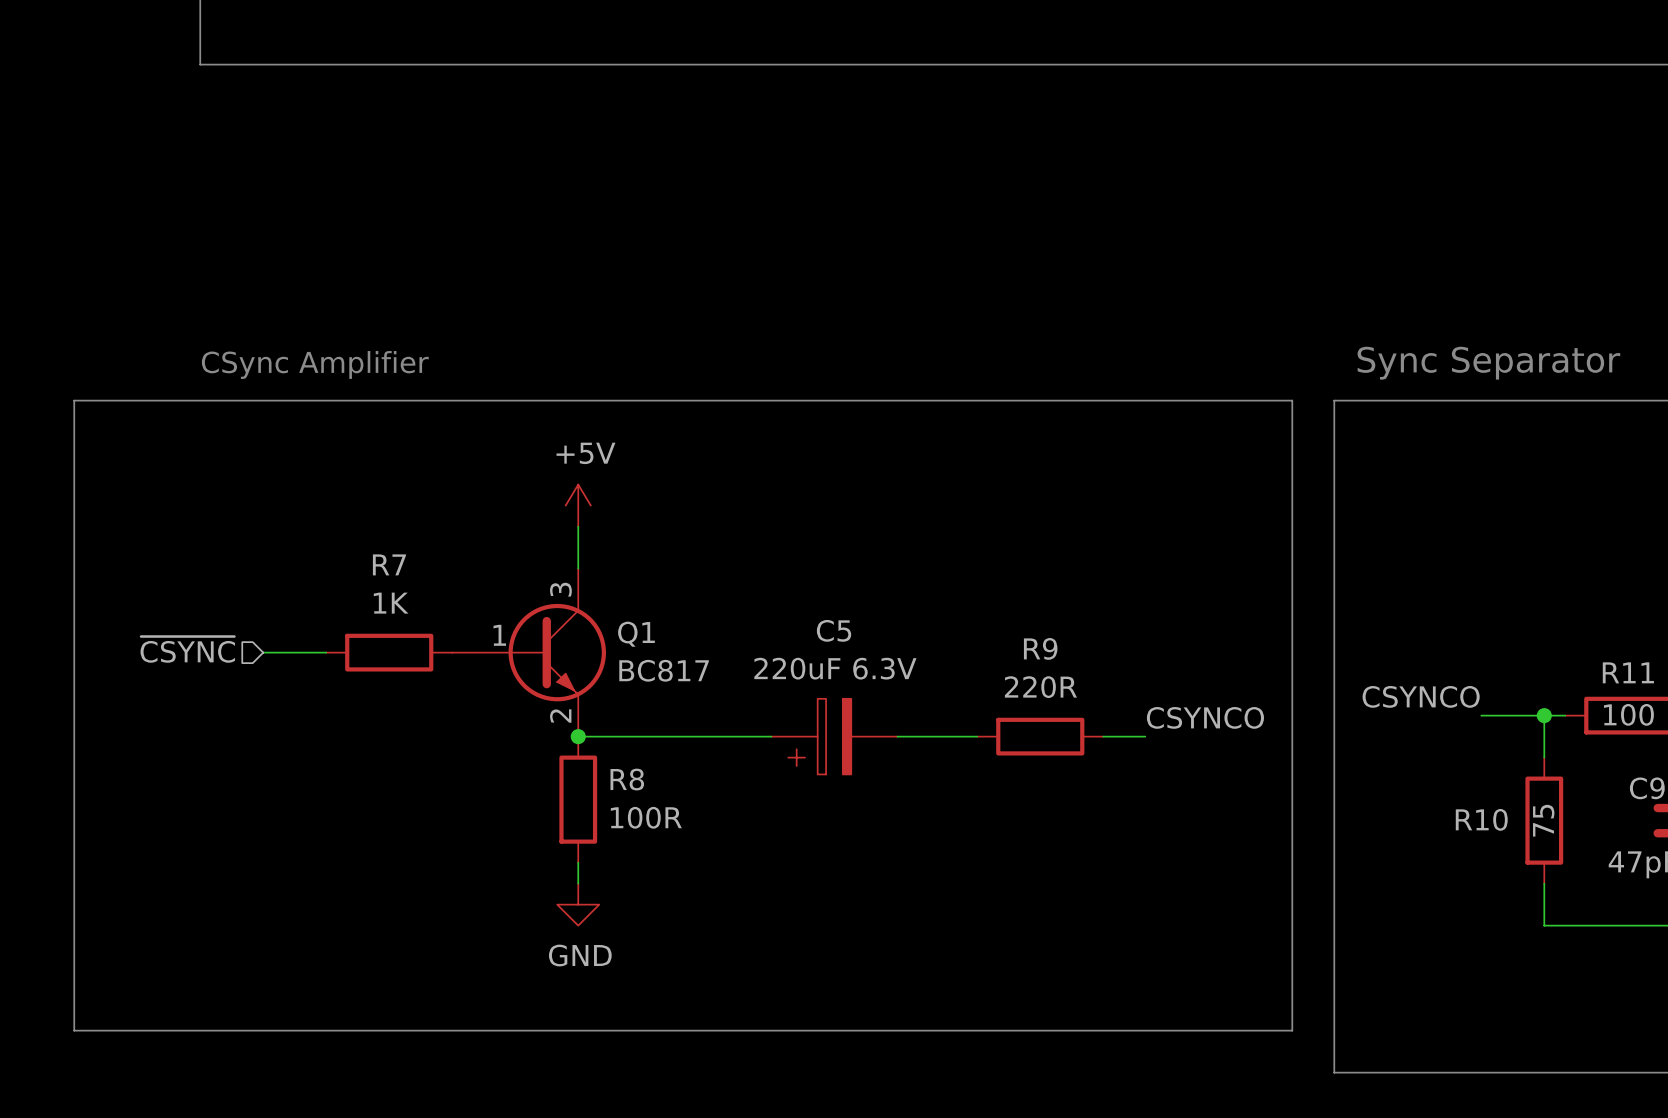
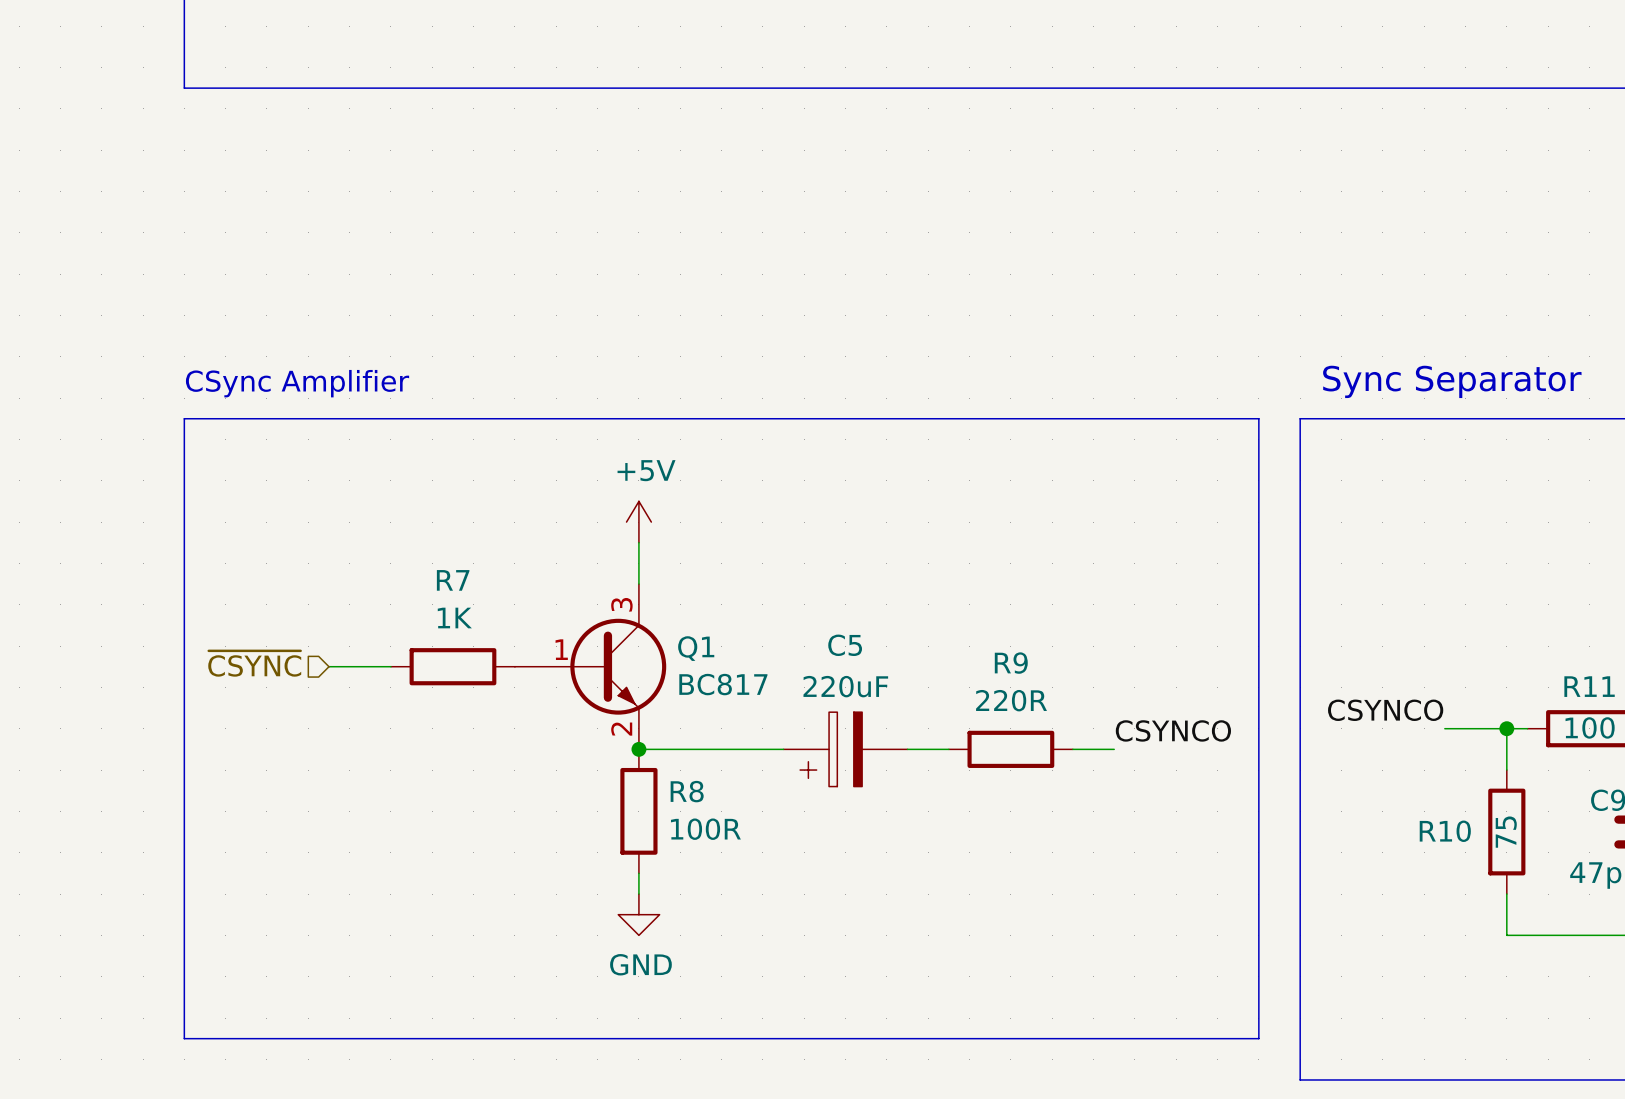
line: (200, 400) (74, 400) (74, 1030) (200, 1030) -> (184, 418) (184, 1038)
power symbol position: +5V (578, 505) -> +5V (638, 522)
wire: (578, 526) (578, 568) -> (638, 542) (638, 584)
hierarchical label position: ~{CSYNC} (187, 649) -> ~{CSYNC} (254, 663)
wire: (263, 652) (326, 652) -> (328, 666) (390, 666)
R7 position: (389, 652) -> (452, 666)
Q1 position: (529, 652) -> (590, 666)
C5 value: 220uF 6.3V (835, 668) -> 220uF (845, 686)
wire: (578, 736) (662, 736) -> none
junction position: (578, 736) -> (638, 749)
C5 position: (834, 736) -> (845, 749)
R8 position: (578, 799) -> (638, 811)
wire: (578, 862) (578, 883) -> (638, 873) (638, 894)
power symbol position: GND (578, 904) -> GND (638, 914)

